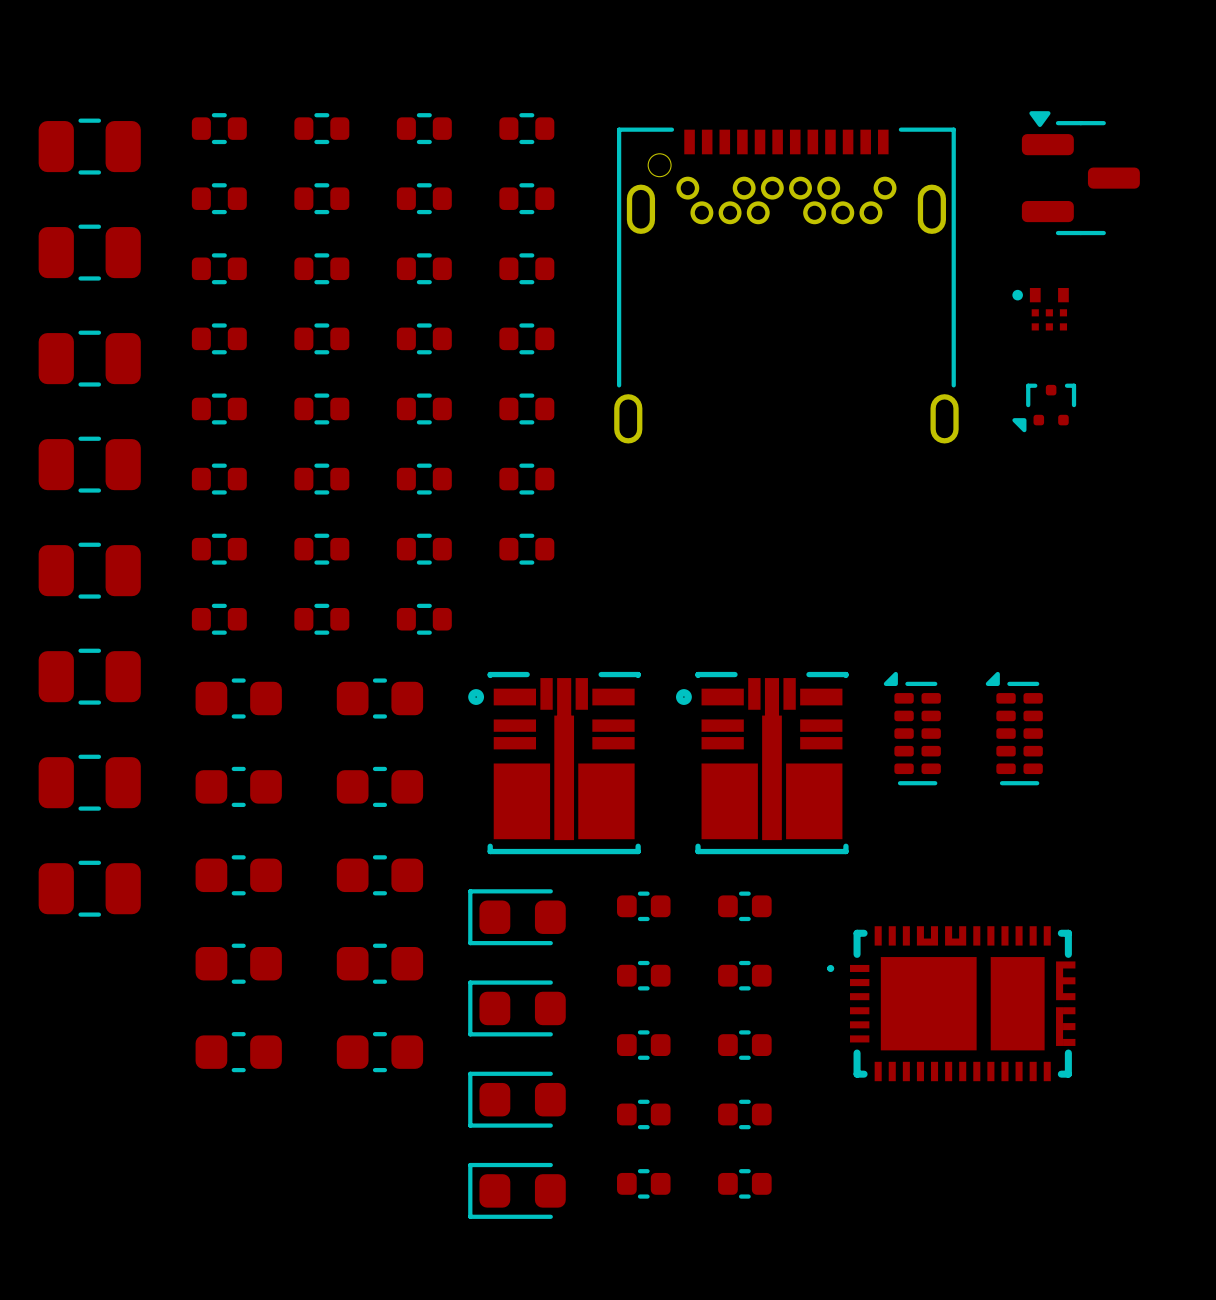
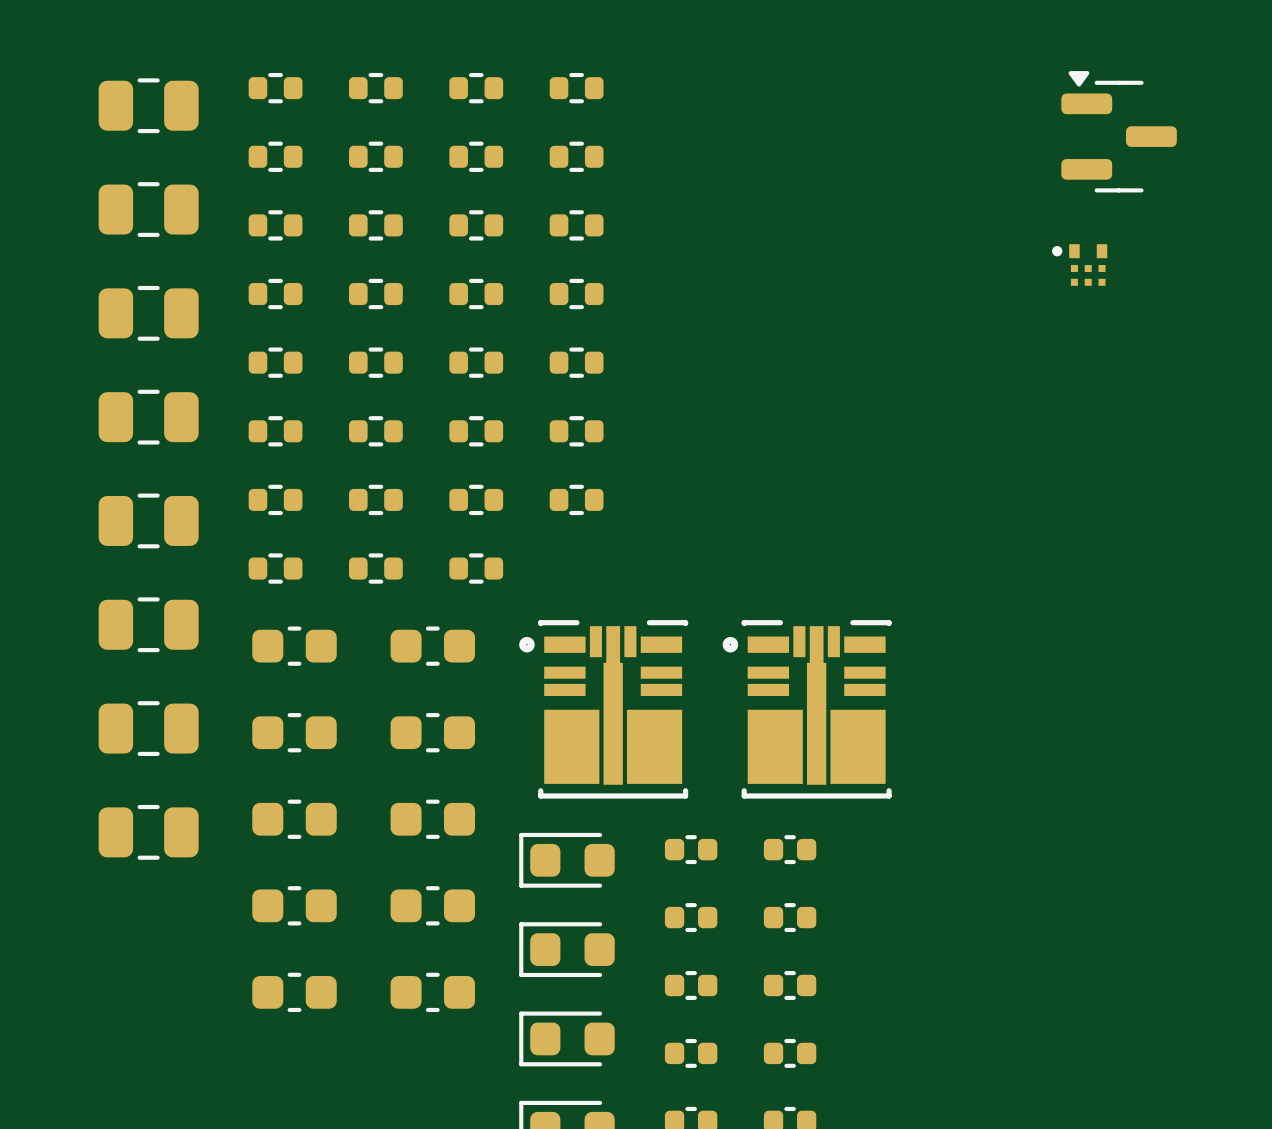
part: (786, 285) -> none
part: (1044, 407) -> none
part: (912, 728) -> none
part: (1014, 728) -> none
part: (951, 1003) -> none

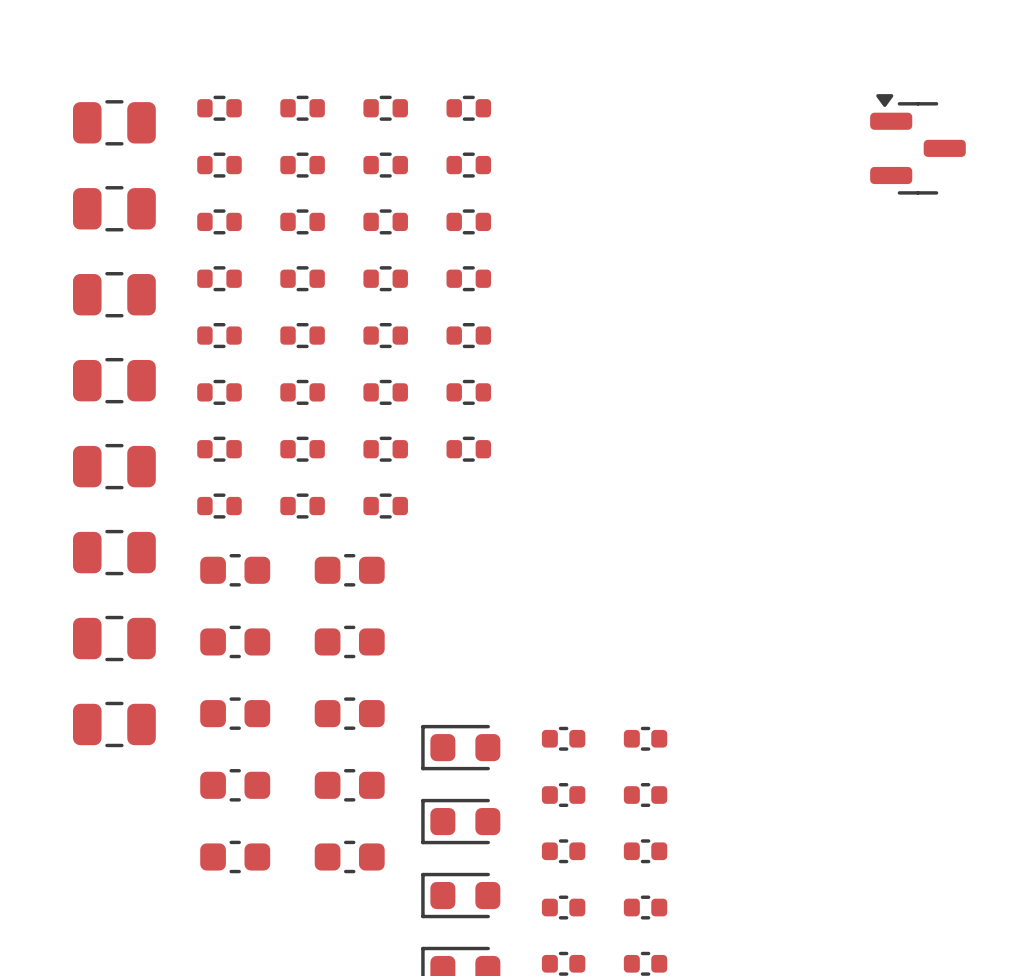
part: (1079, 265) -> none
part: (603, 709) -> none
part: (807, 709) -> none

